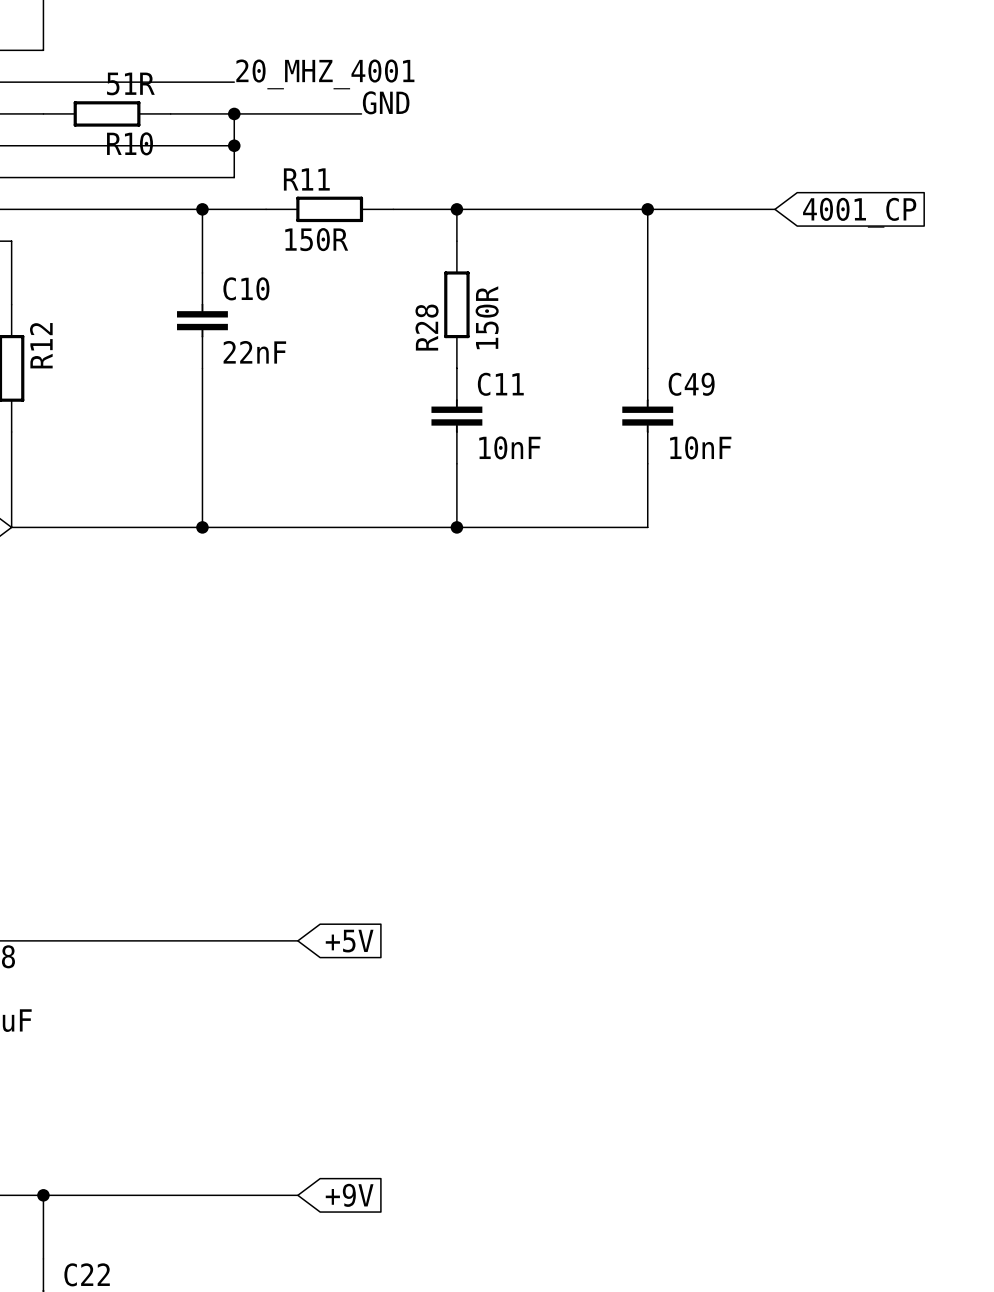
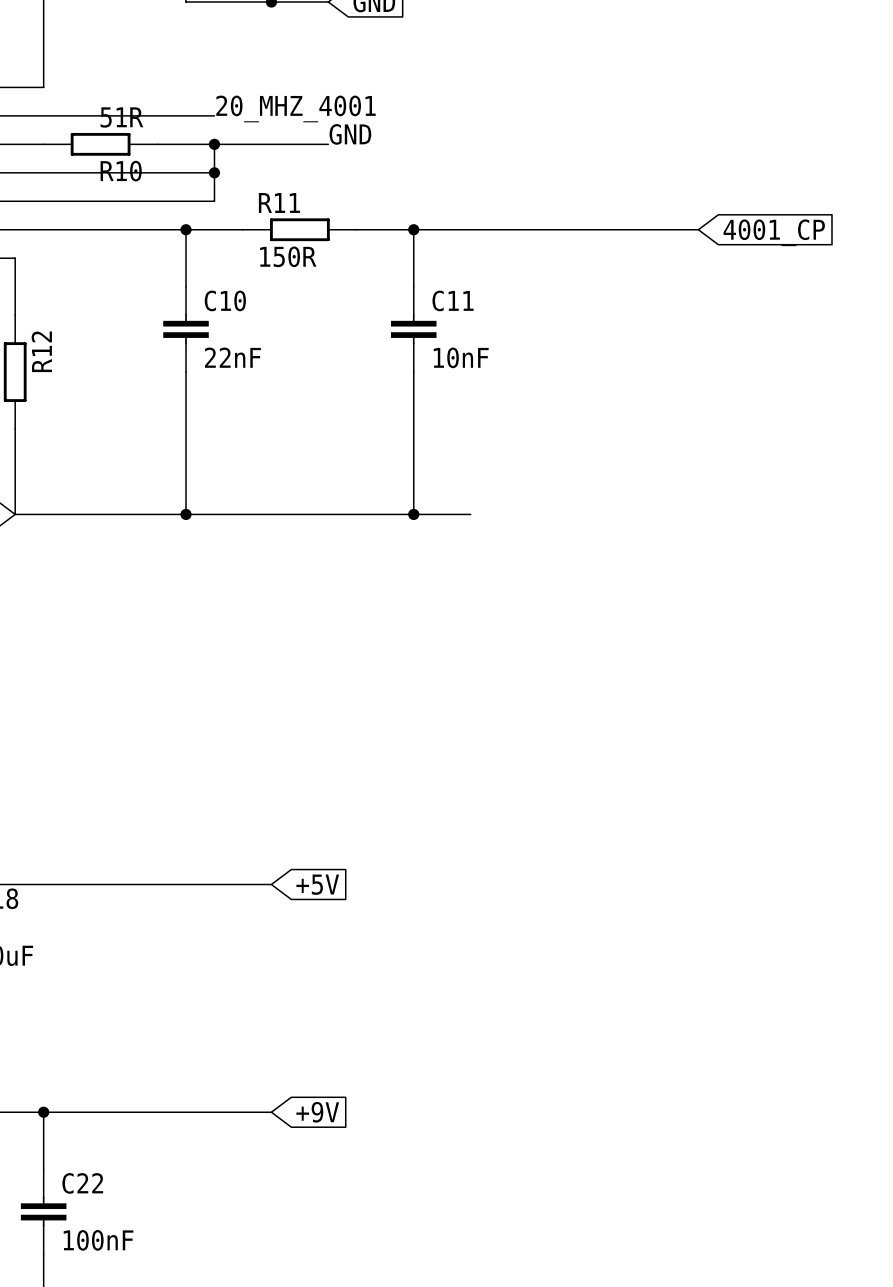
wire: (647, 209) (647, 368) -> none
junction: (647, 209) -> none
R28: 150R (456, 304) -> none
C11 position: (456, 416) -> (413, 329)
C49: 10nF (647, 416) -> none
wire: (647, 463) (647, 527) (520, 527) -> none

